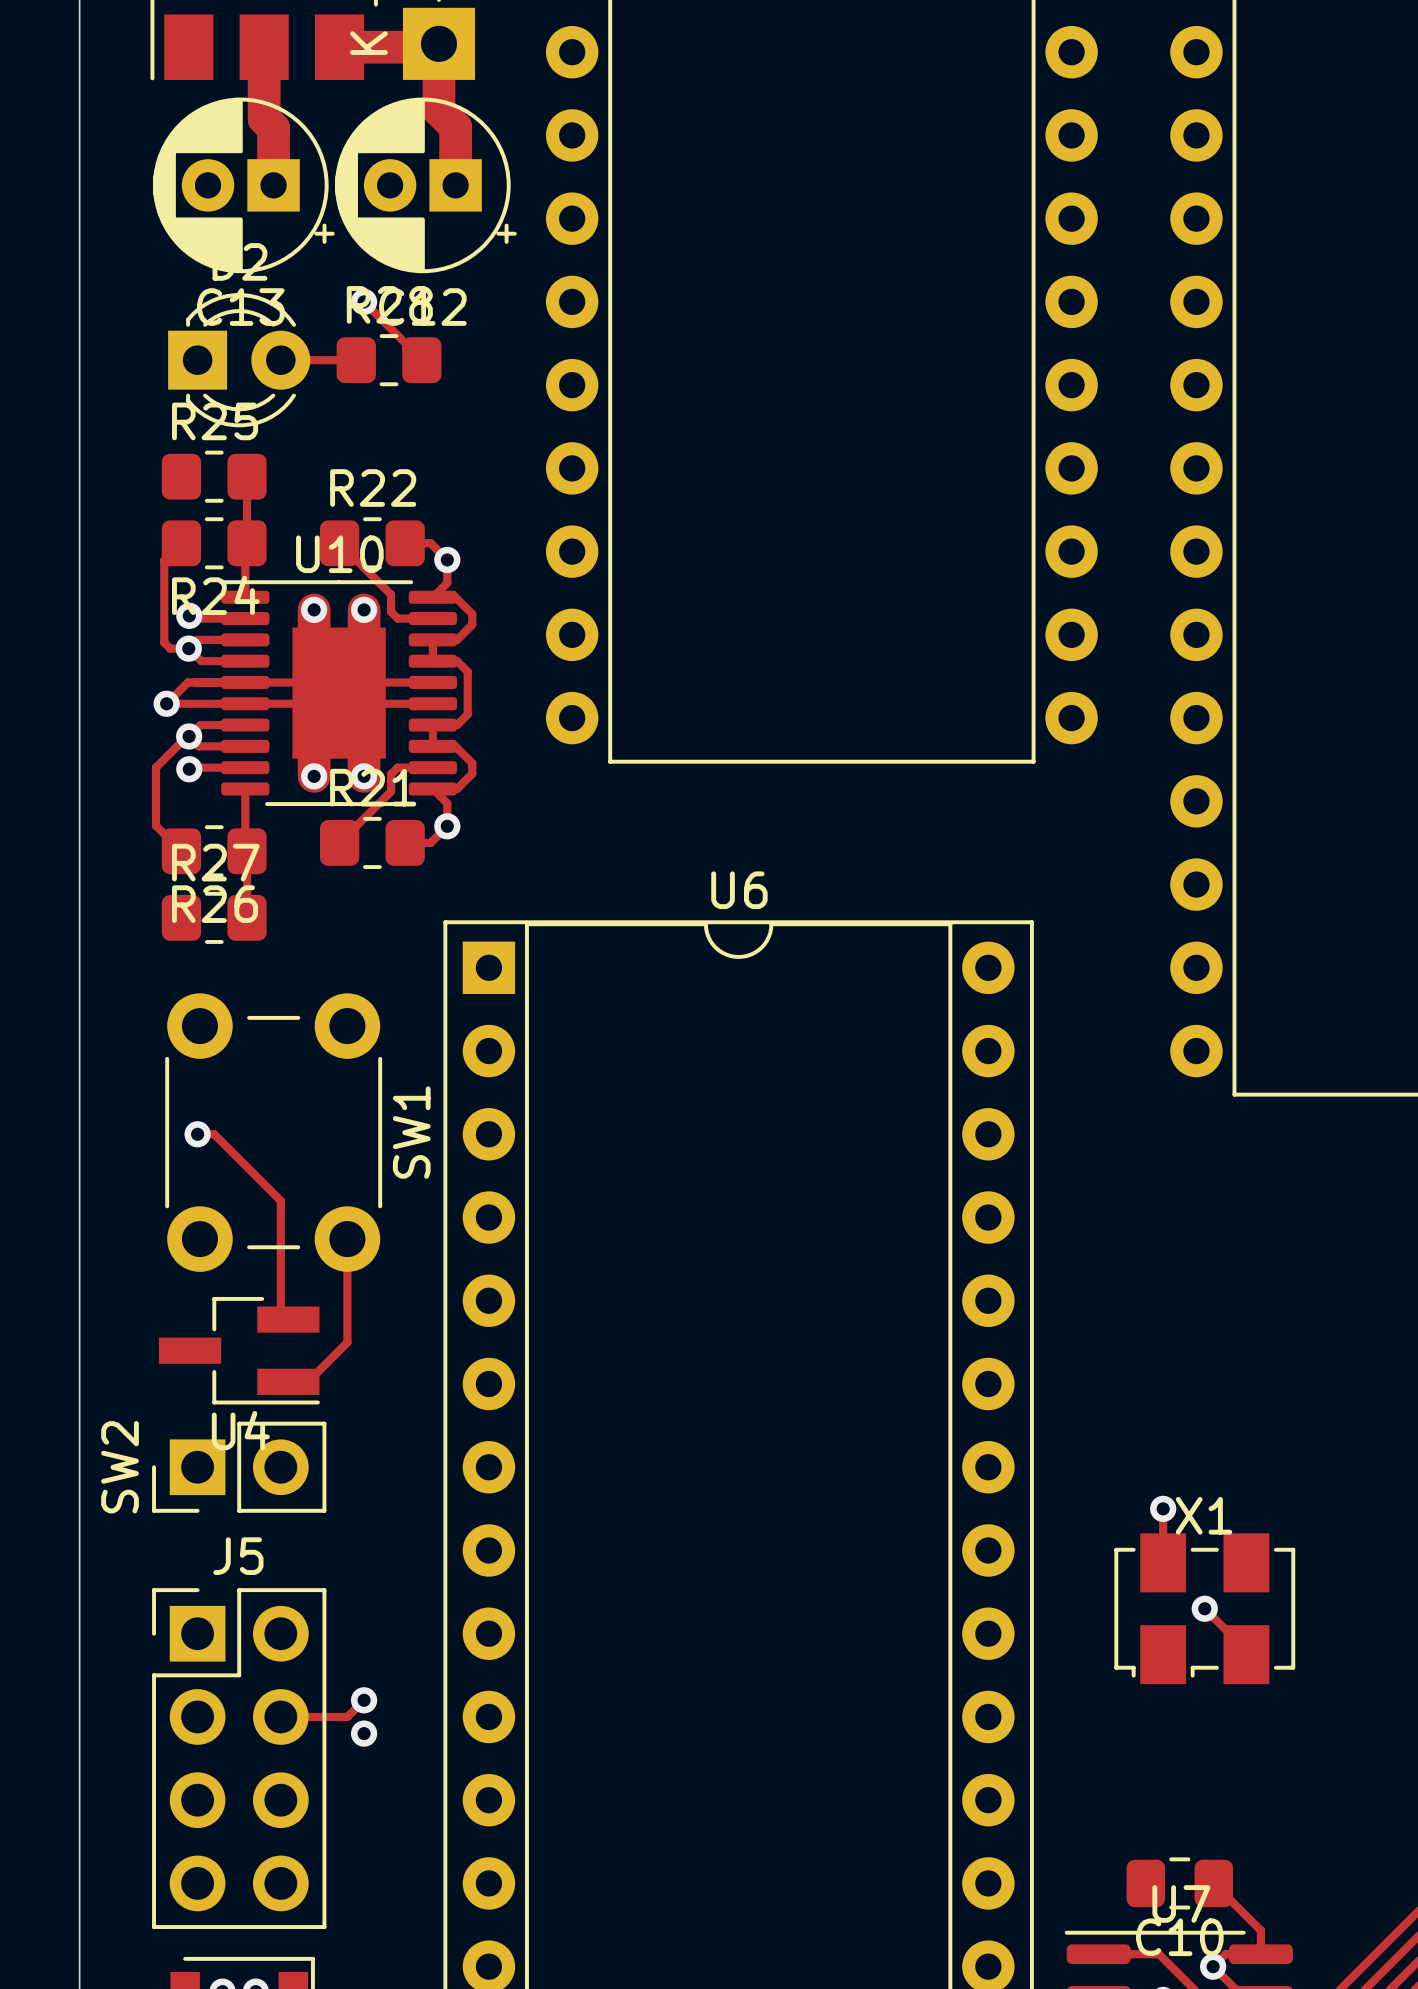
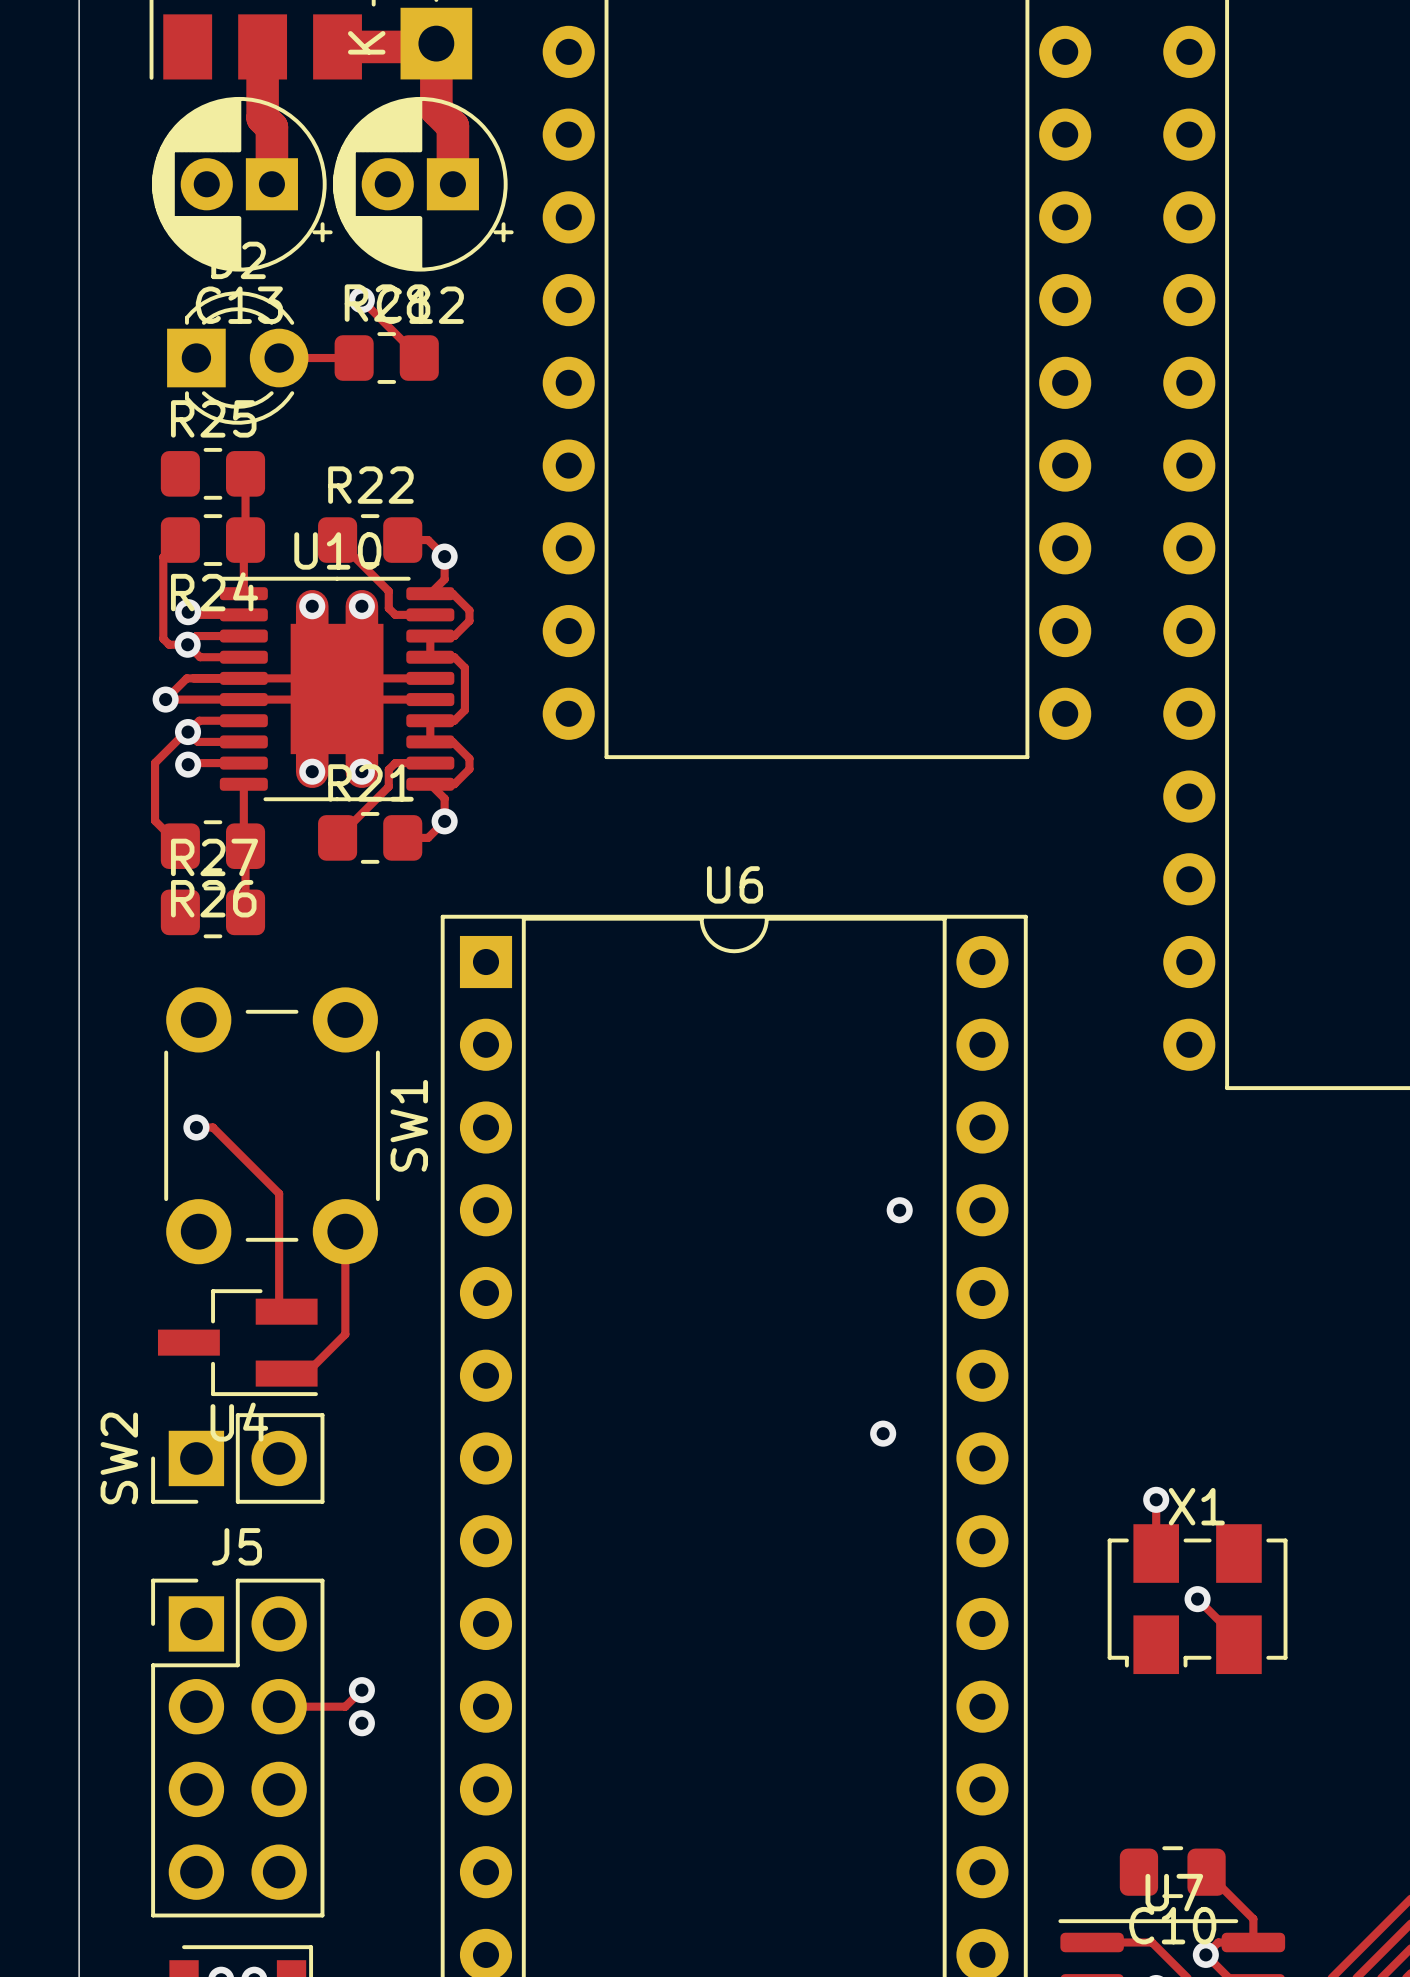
via: none -> (899, 1210)
via: none -> (883, 1433)

